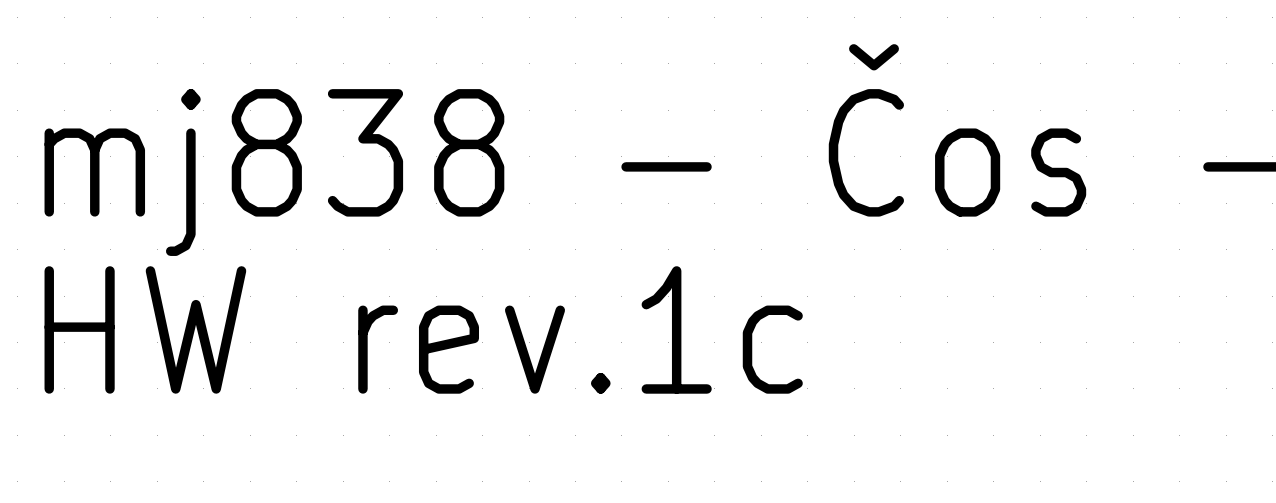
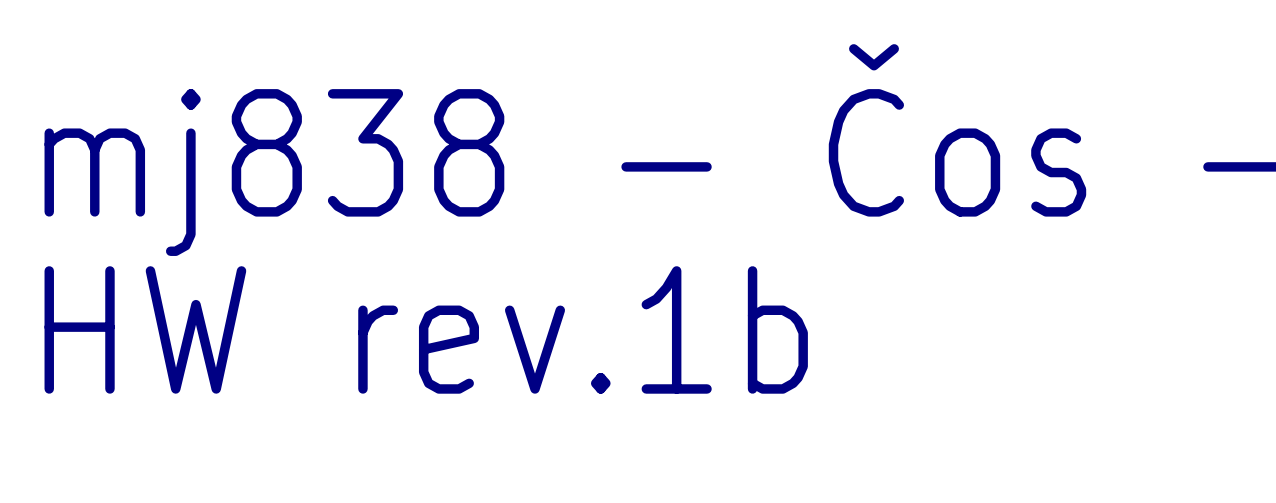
text: HW rev.1c (423, 329) -> HW rev.1b (426, 329)

